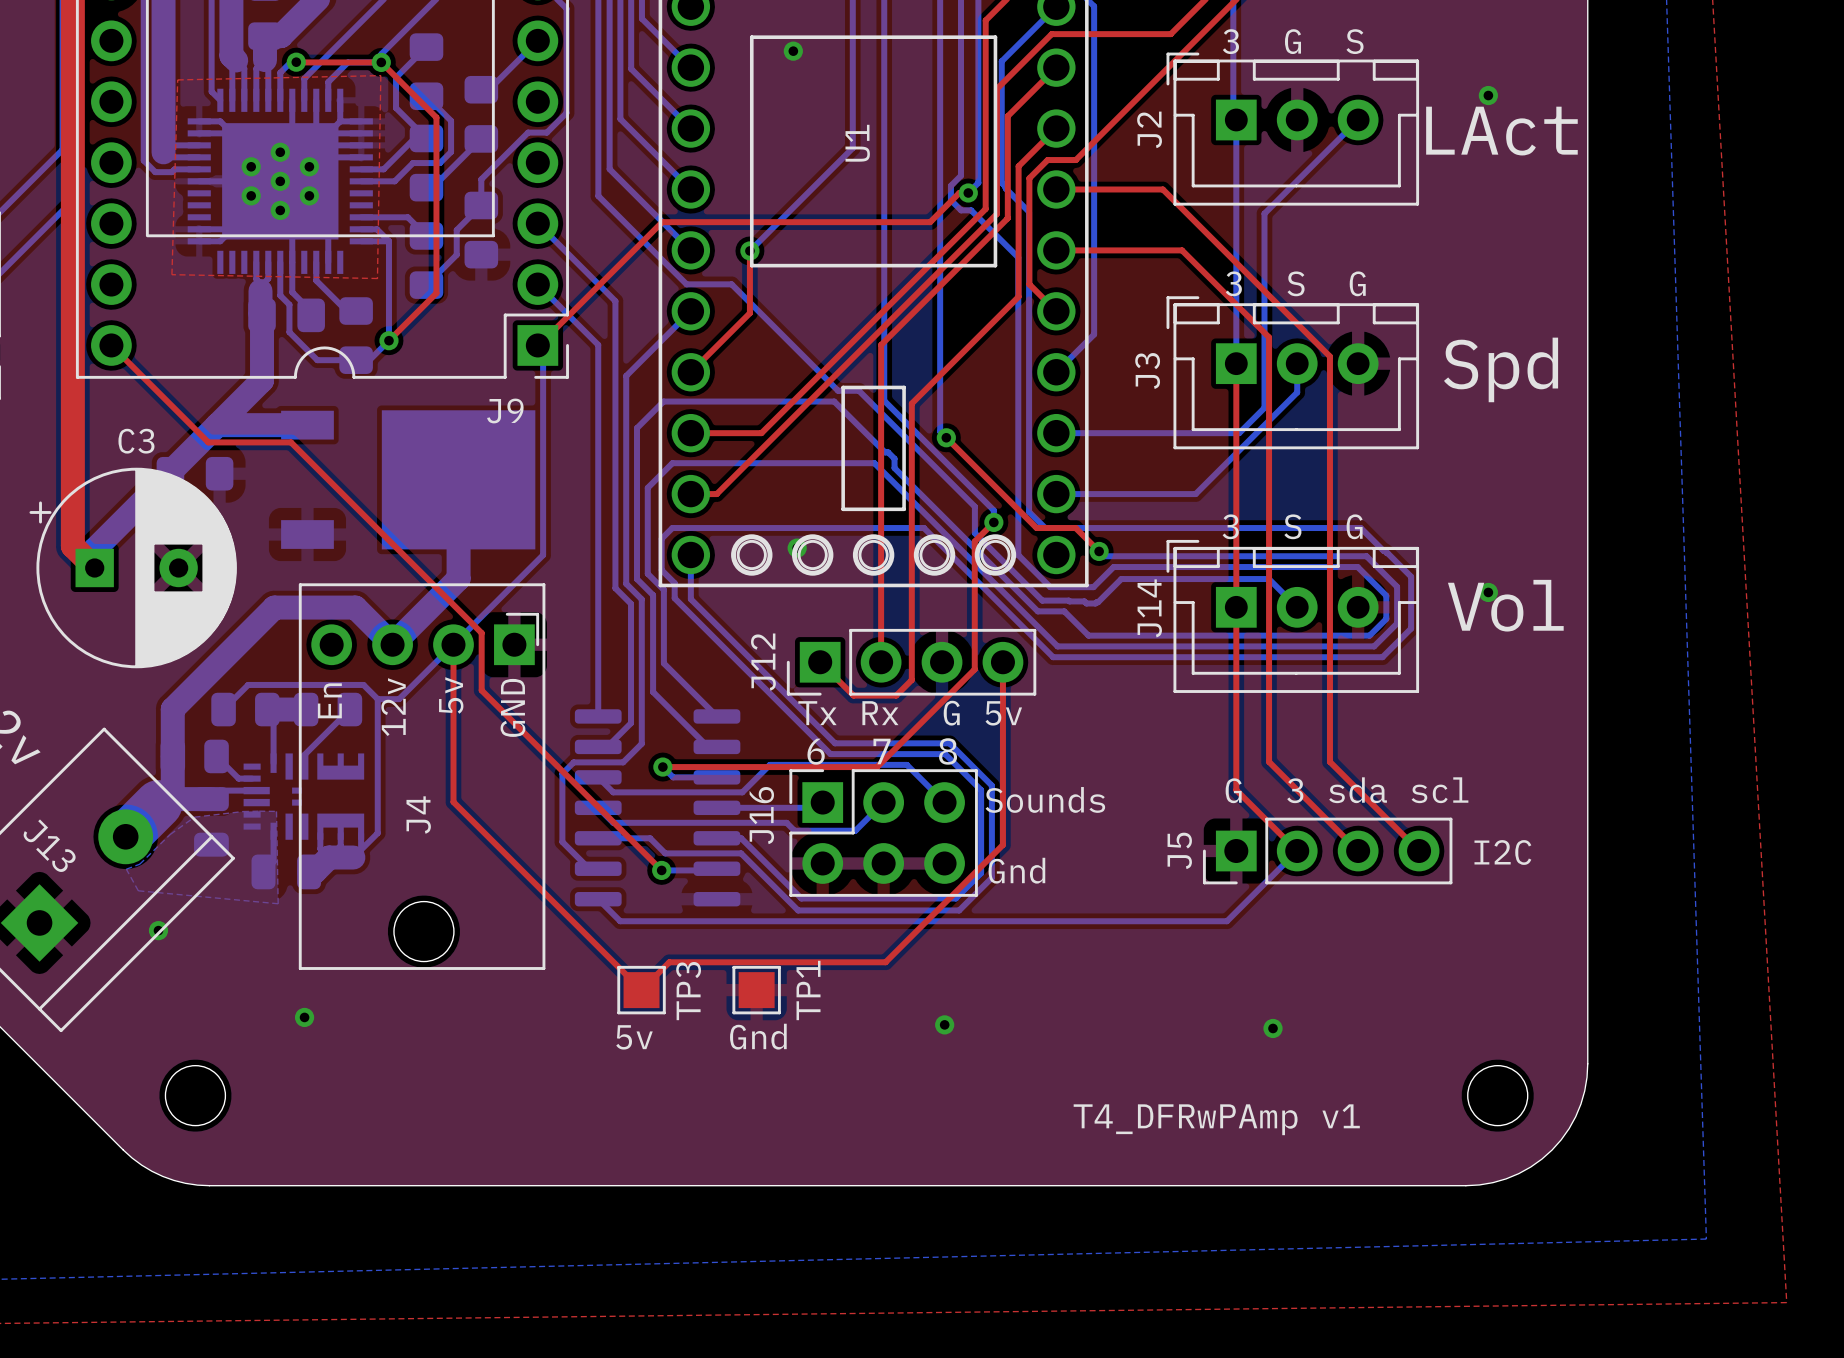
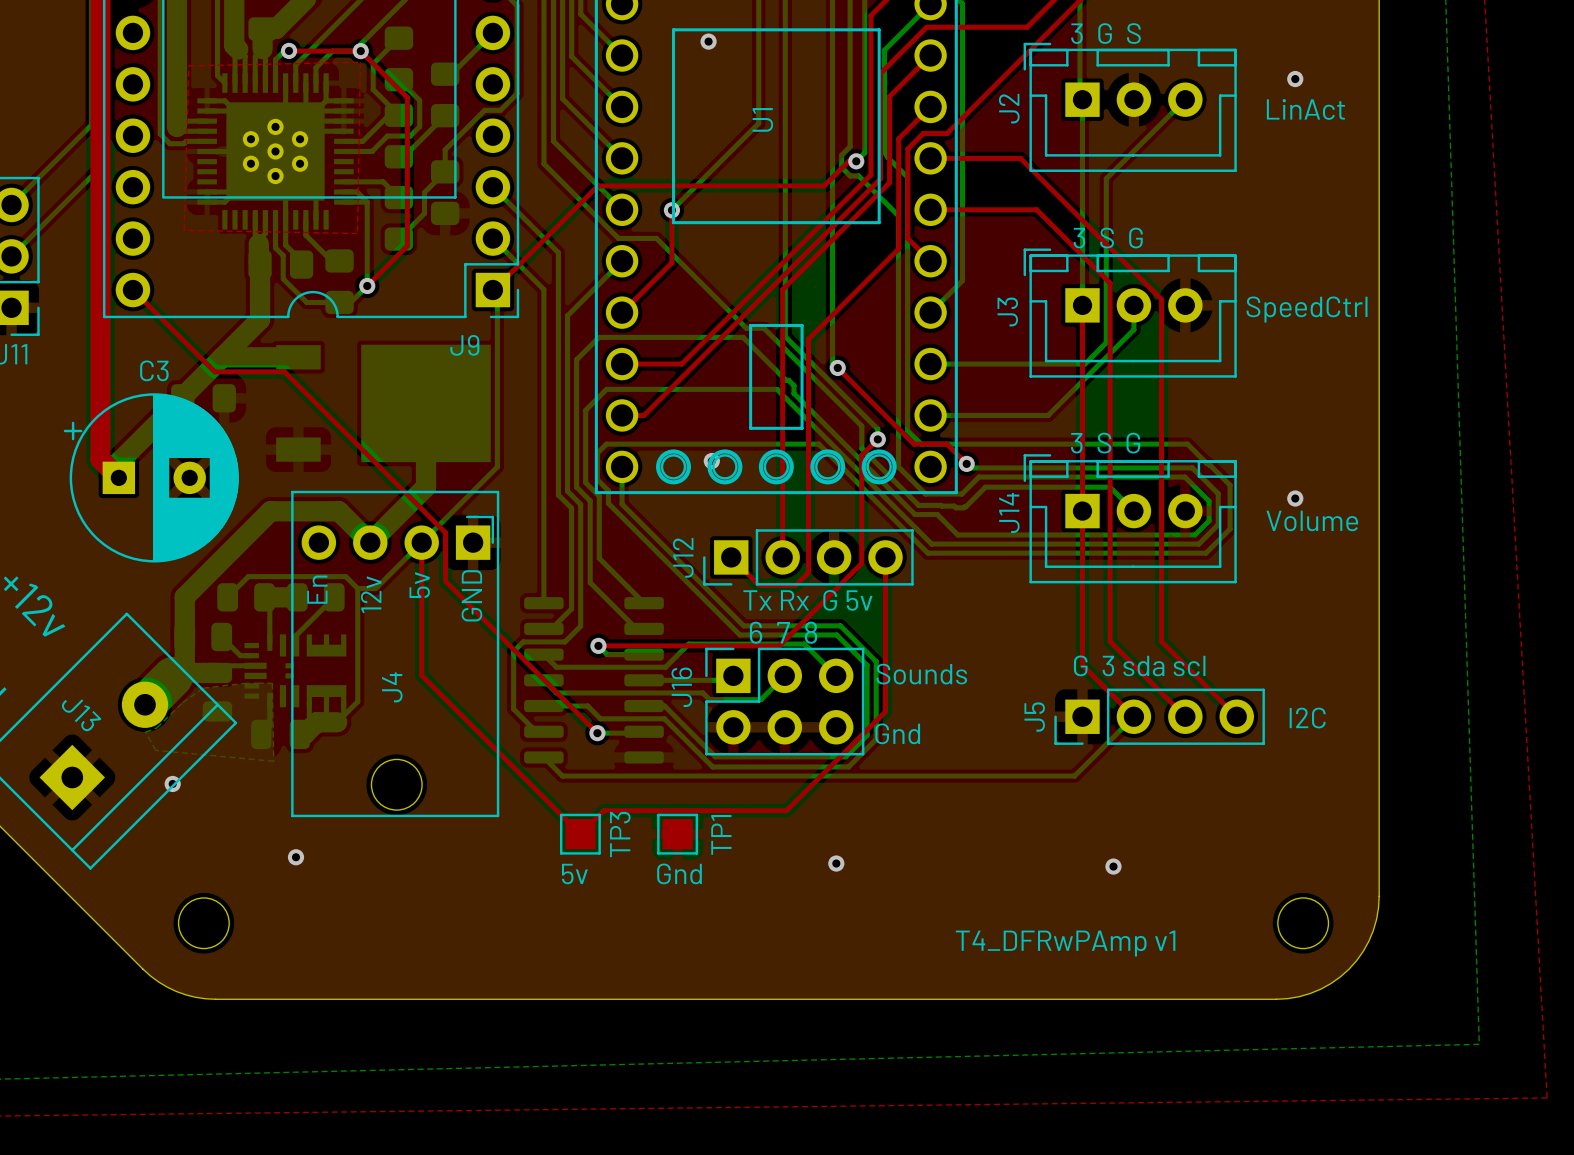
J2 value: LAct (1501, 131) -> LinAct (1305, 109)
J3 value: Spd (1501, 369) -> SpeedCtrl (1307, 309)
J14 value: Vol (1505, 605) -> Volume (1312, 520)

